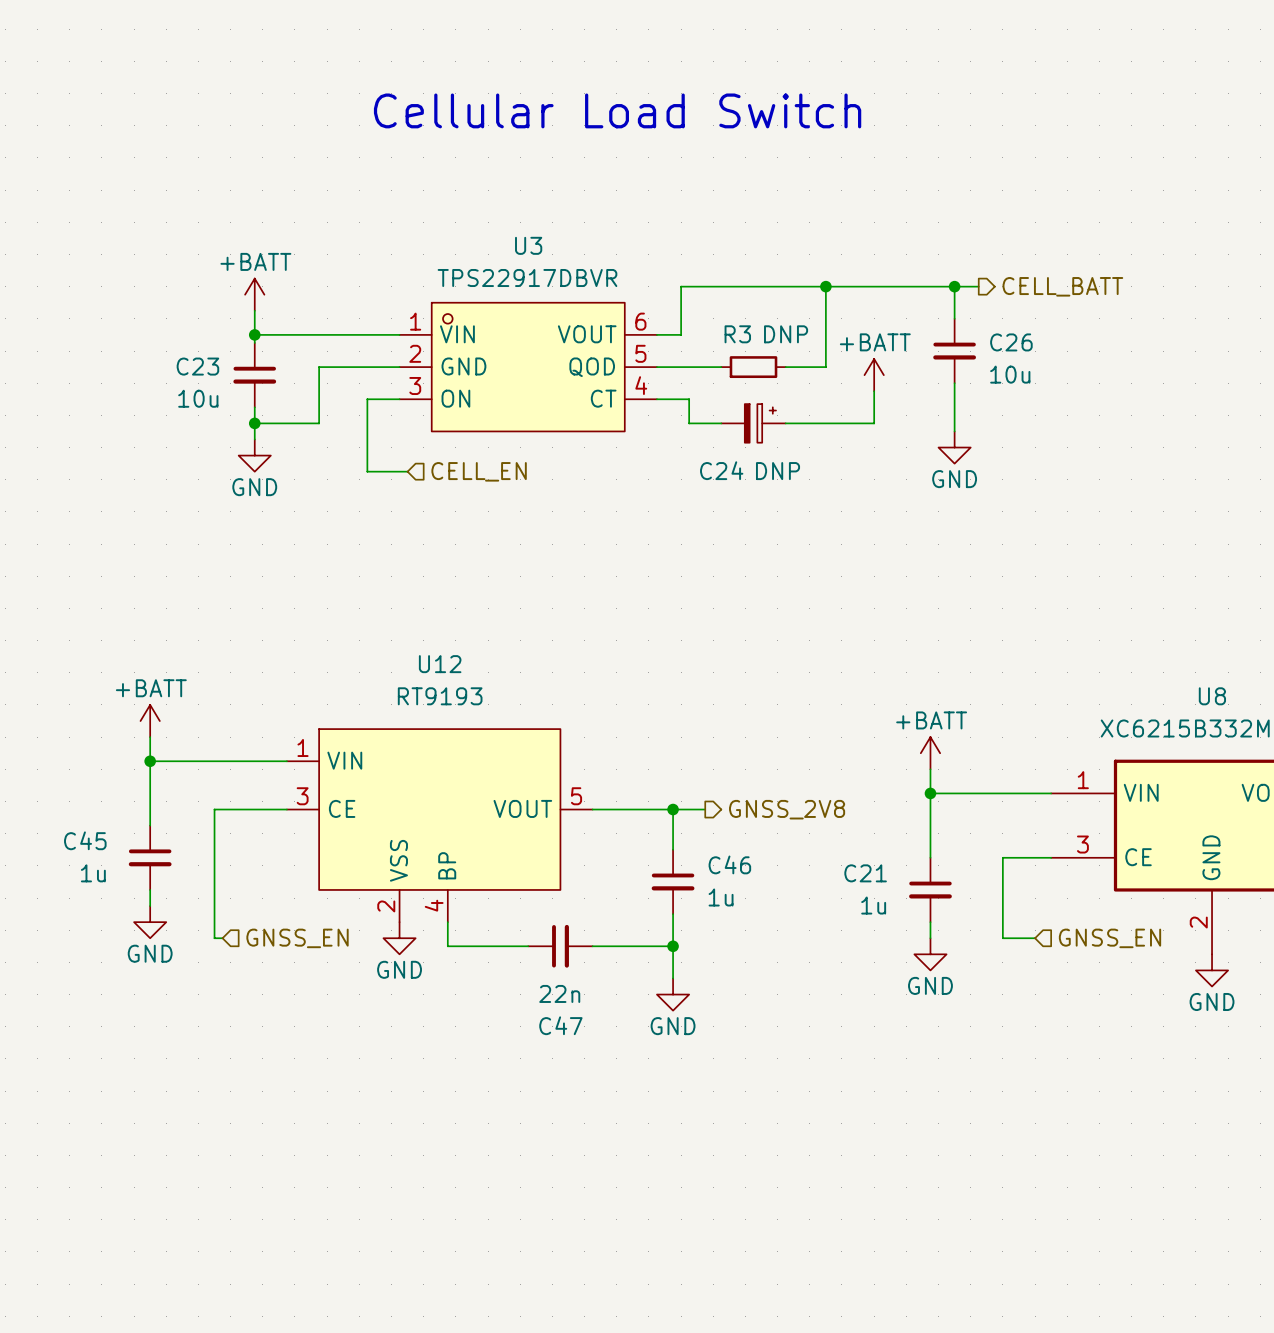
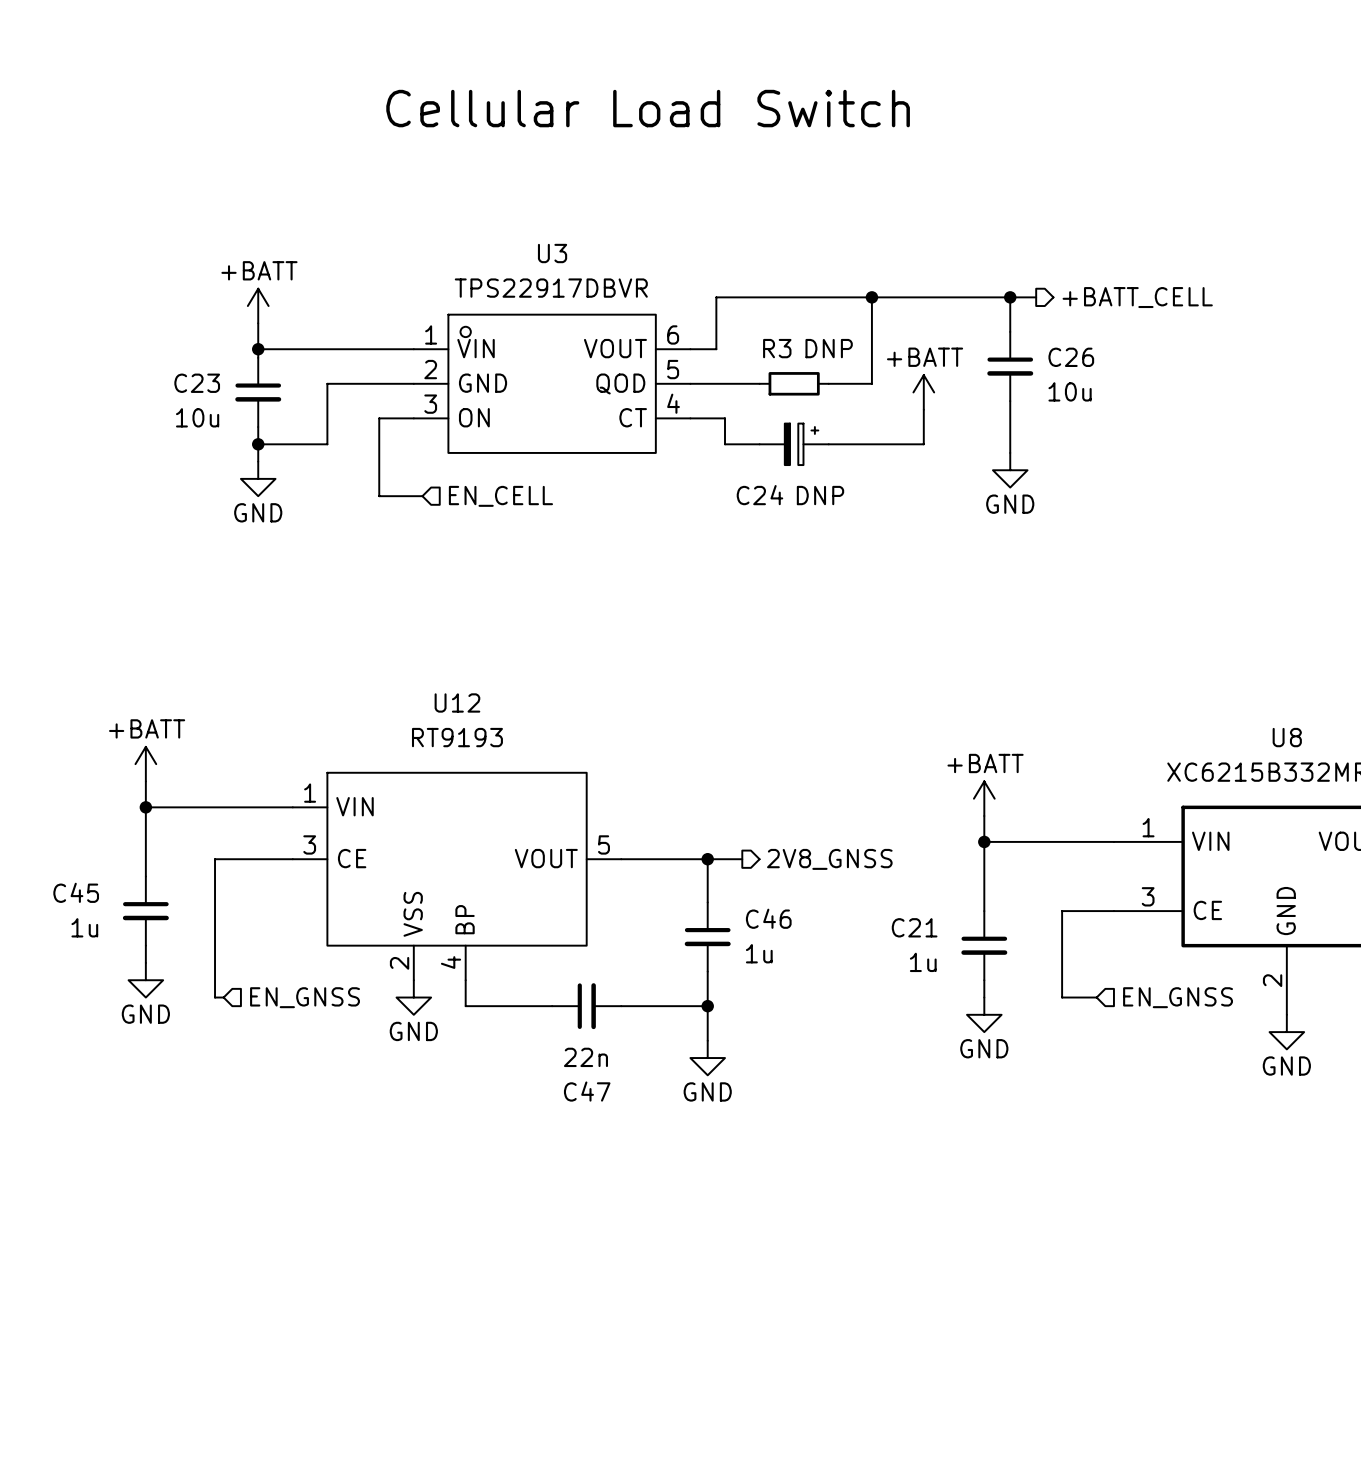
hierarchical label: CELL_BATT (1062, 286) -> +BATT_CELL (1137, 297)
hierarchical label: CELL_EN (479, 471) -> EN_CELL (500, 496)
hierarchical label: GNSS_2V8 (787, 809) -> 2V8_GNSS (829, 859)
hierarchical label: GNSS_EN (297, 938) -> EN_GNSS (305, 997)
hierarchical label: GNSS_EN (1110, 938) -> EN_GNSS (1178, 997)

